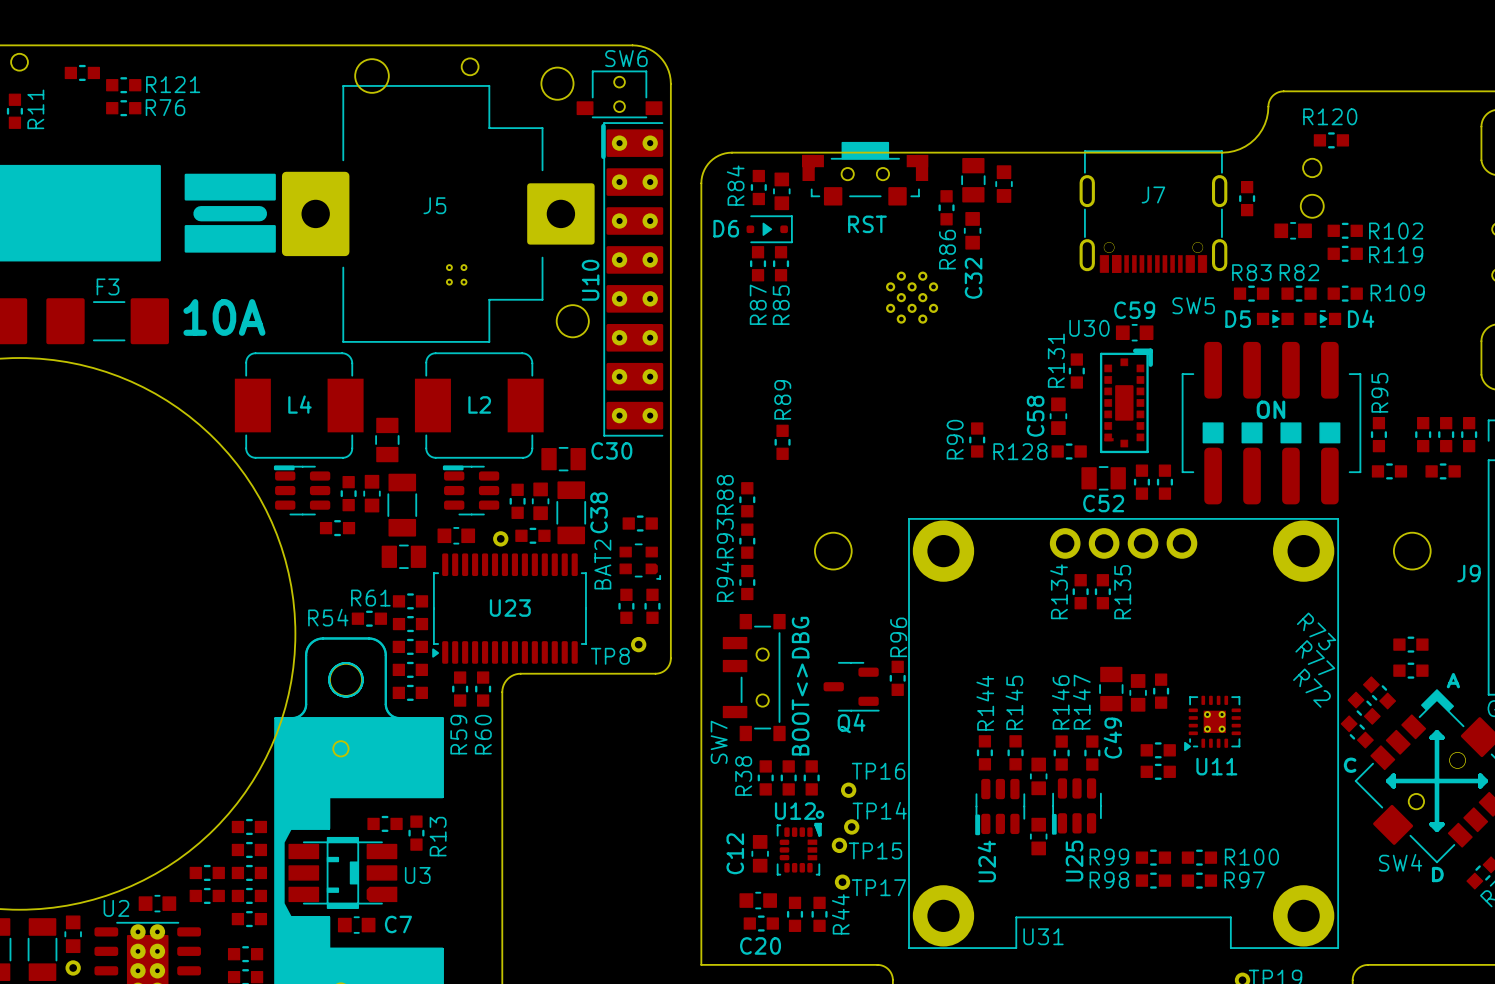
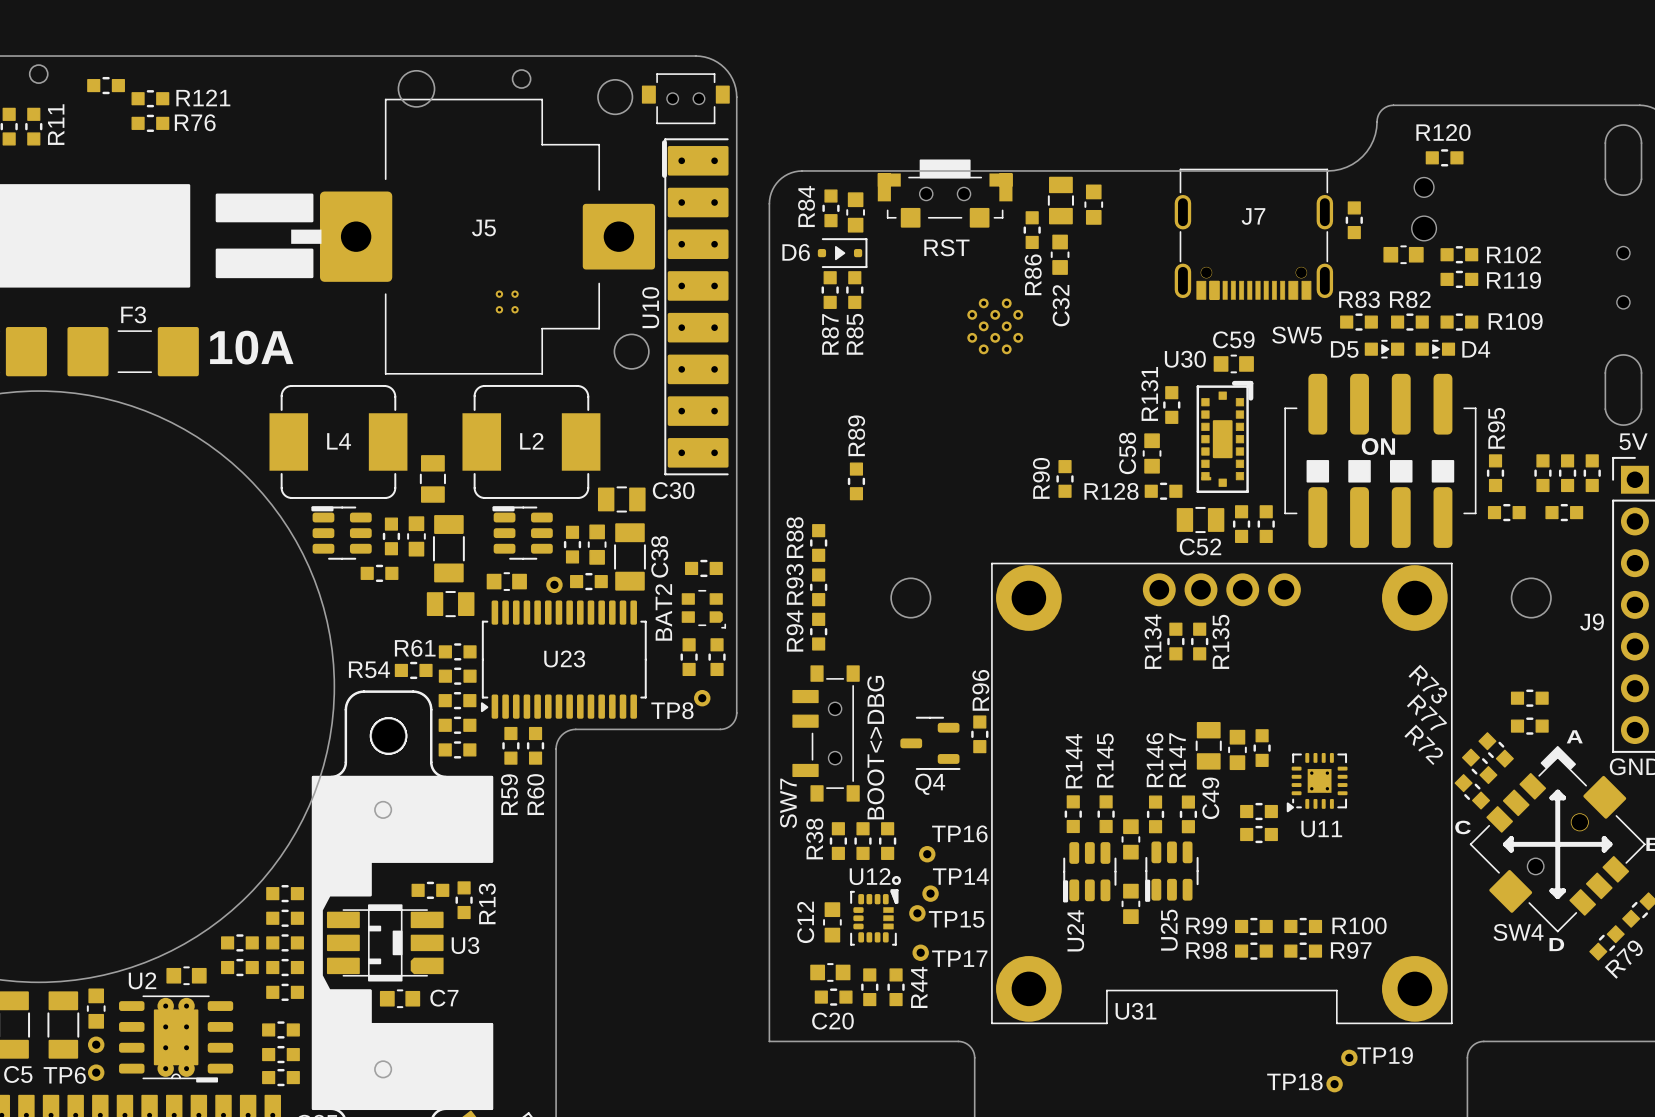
part: none -> (685, 98)
SW6: (619, 94) -> none

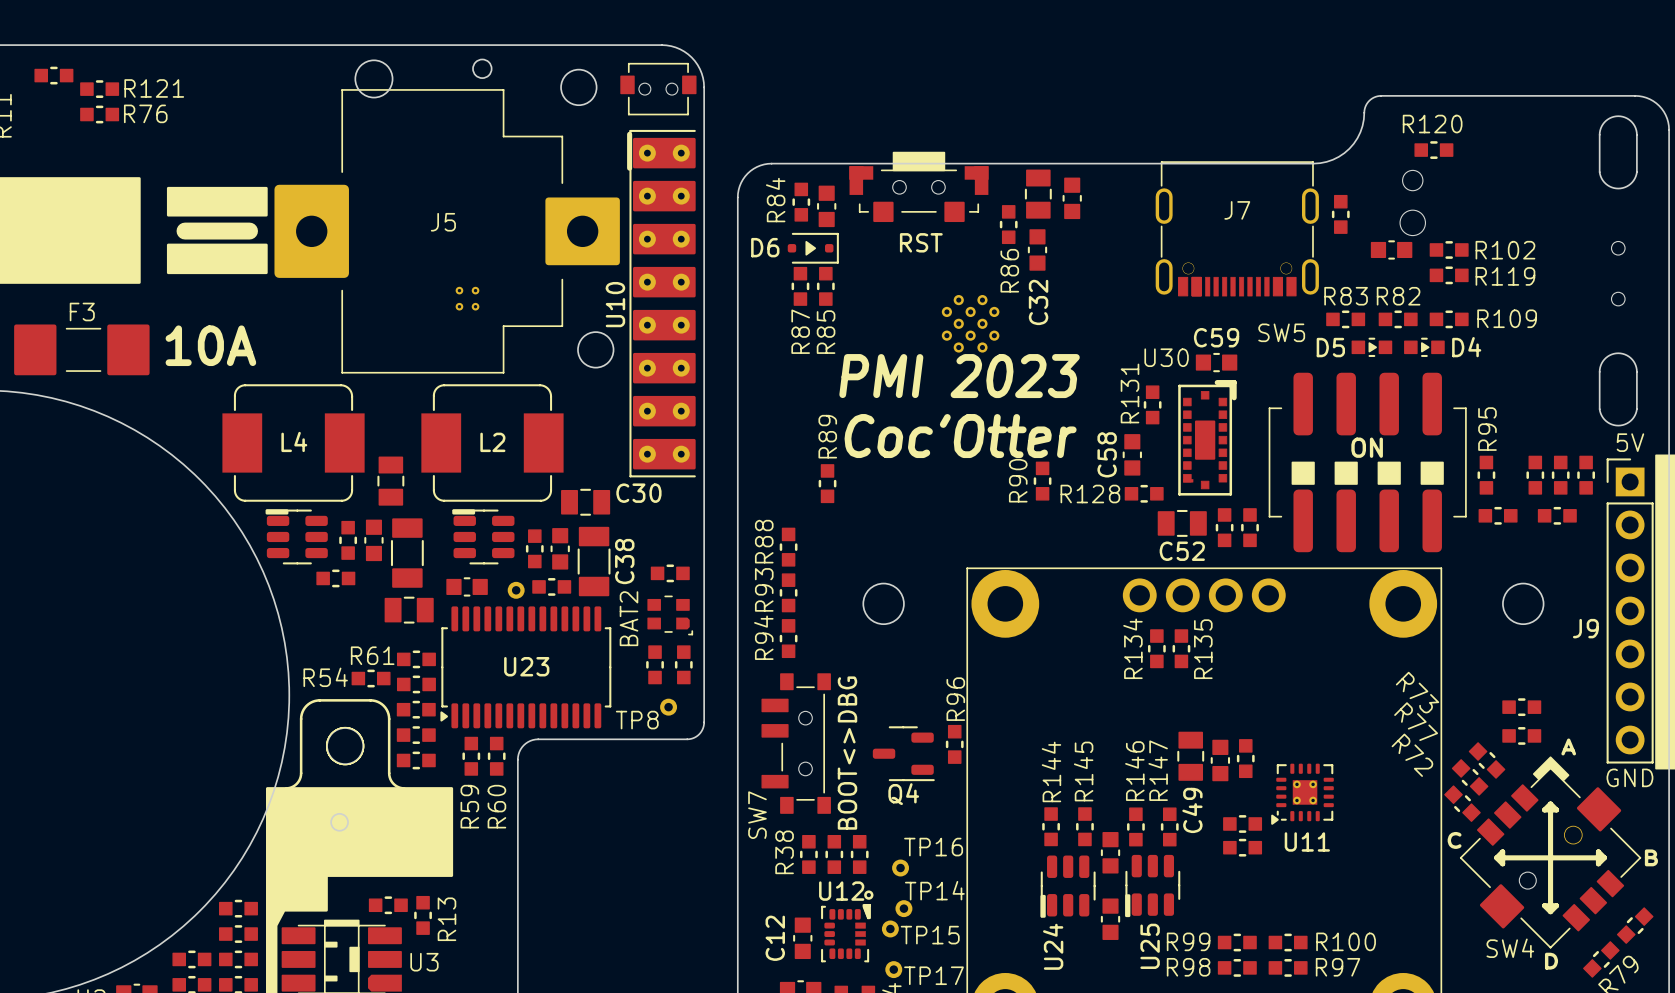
part footprint: [641, 73, 730, 125] -> [620, 62, 697, 116]
text: none -> PMI 2023 (959, 376)
text: none -> Coc'Otter (960, 436)

